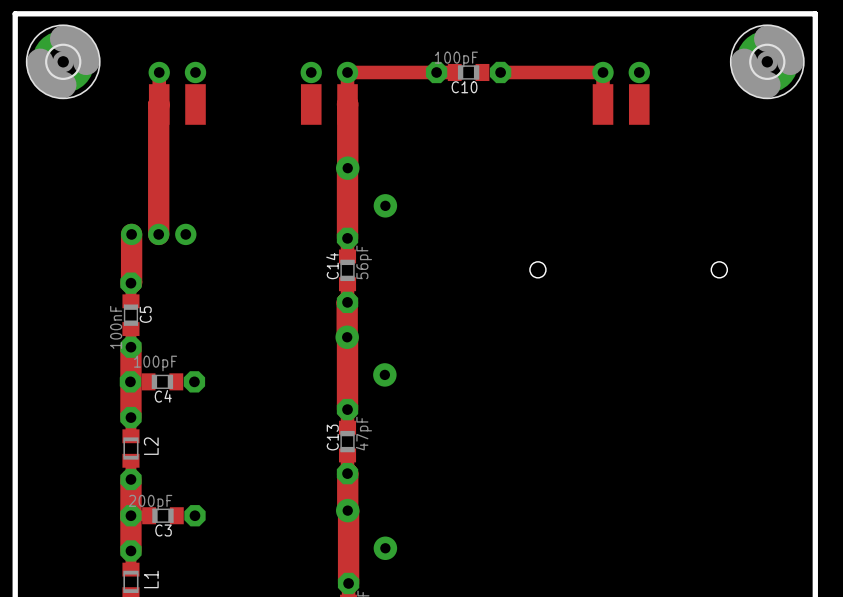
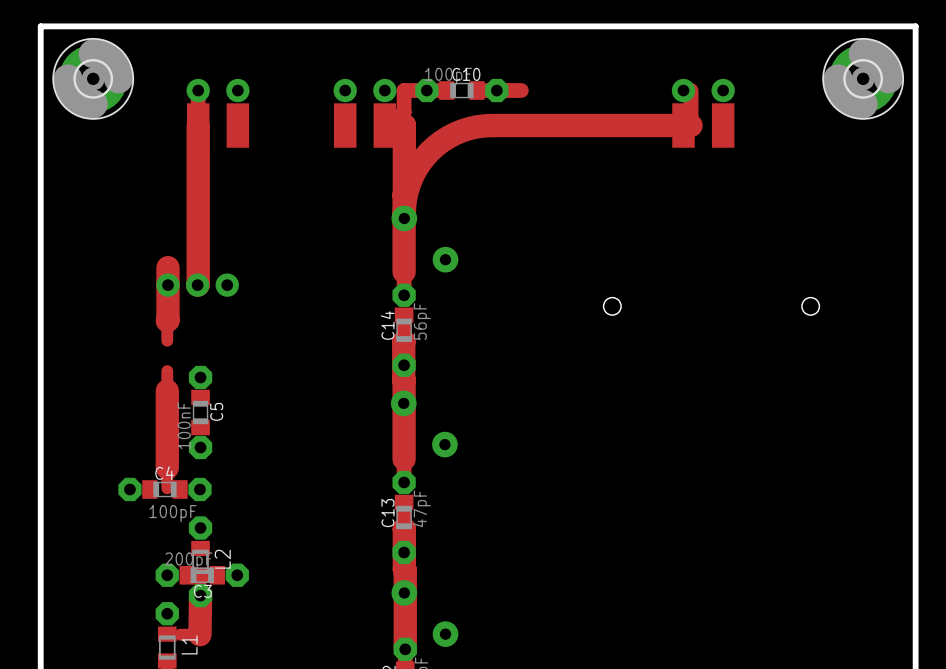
track: (386, 72) (414, 72) -> none
C10 position: (468, 72) -> (461, 90)
track: (500, 72) (603, 72) (603, 104) -> none
track: none -> (691, 90) (691, 125) (492, 125) (469, 128) (455, 133) (435, 146) (416, 169) (407, 190) (404, 218)
C10 name position: C10 (464, 87) -> C10 (466, 74)
part position: (329, 93) -> (365, 113)
track: (159, 104) (158, 234) -> (198, 125) (197, 285)
part position: (366, 187) -> (424, 239)
part position: (158, 234) -> (197, 285)
C14 position: (347, 270) -> (404, 330)
C5 position: (130, 315) -> (200, 412)
part position: (366, 356) -> (424, 424)
C4 value position: 100pF (155, 363) -> 100pF (172, 513)
C4 position: (162, 381) -> (164, 489)
C4 name position: C4 (163, 396) -> C4 (164, 473)
C13 position: (347, 441) -> (404, 517)
L2 position: (130, 448) -> (200, 561)
track: (130, 460) (130, 569) -> none
track: none -> (200, 575) (199, 634) (180, 634)
part position: (366, 529) -> (424, 613)

